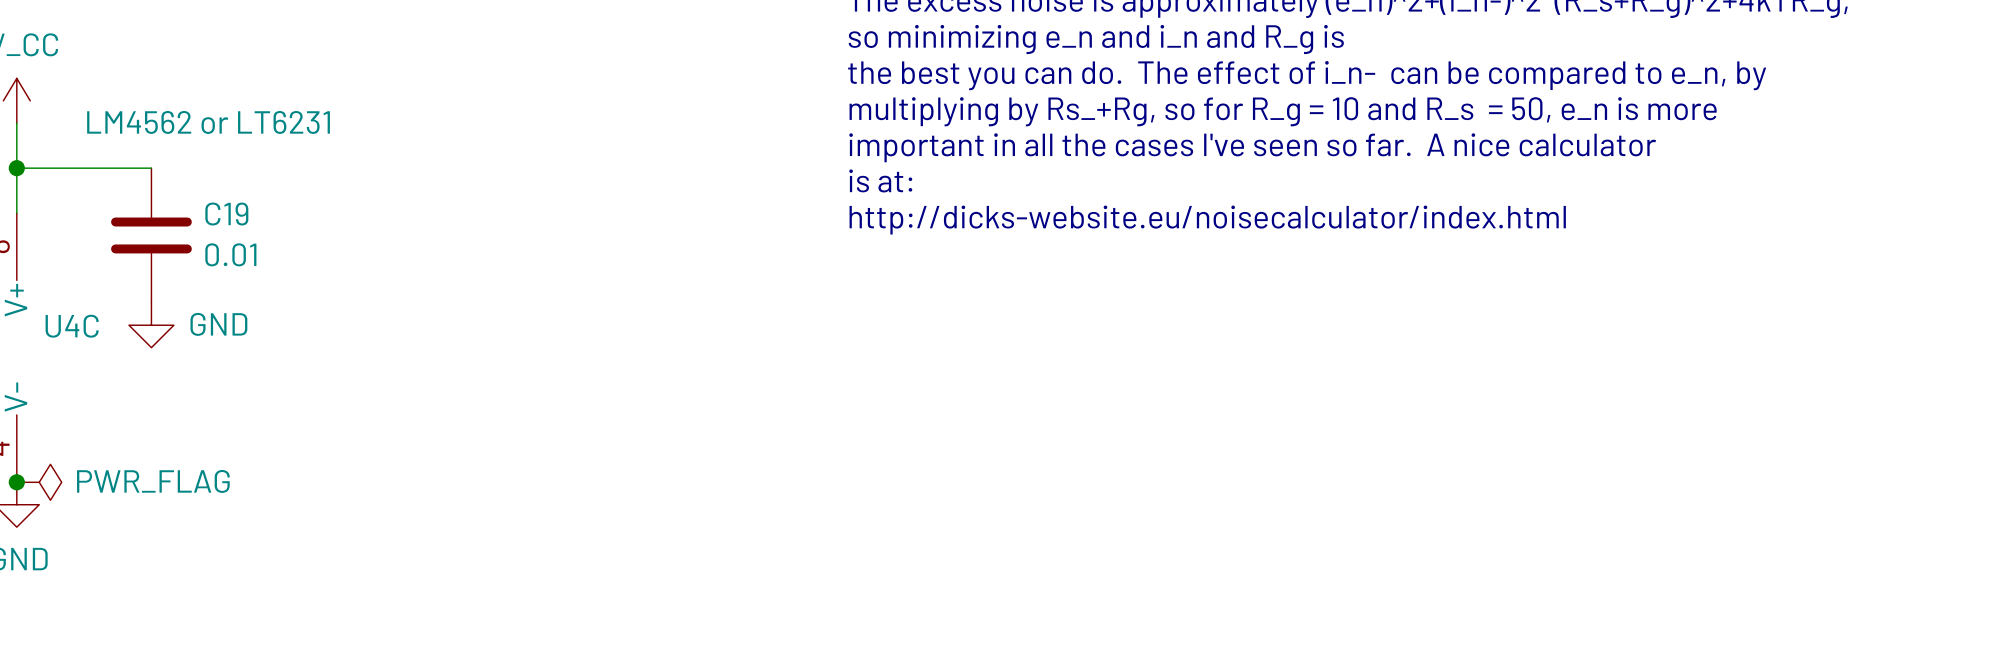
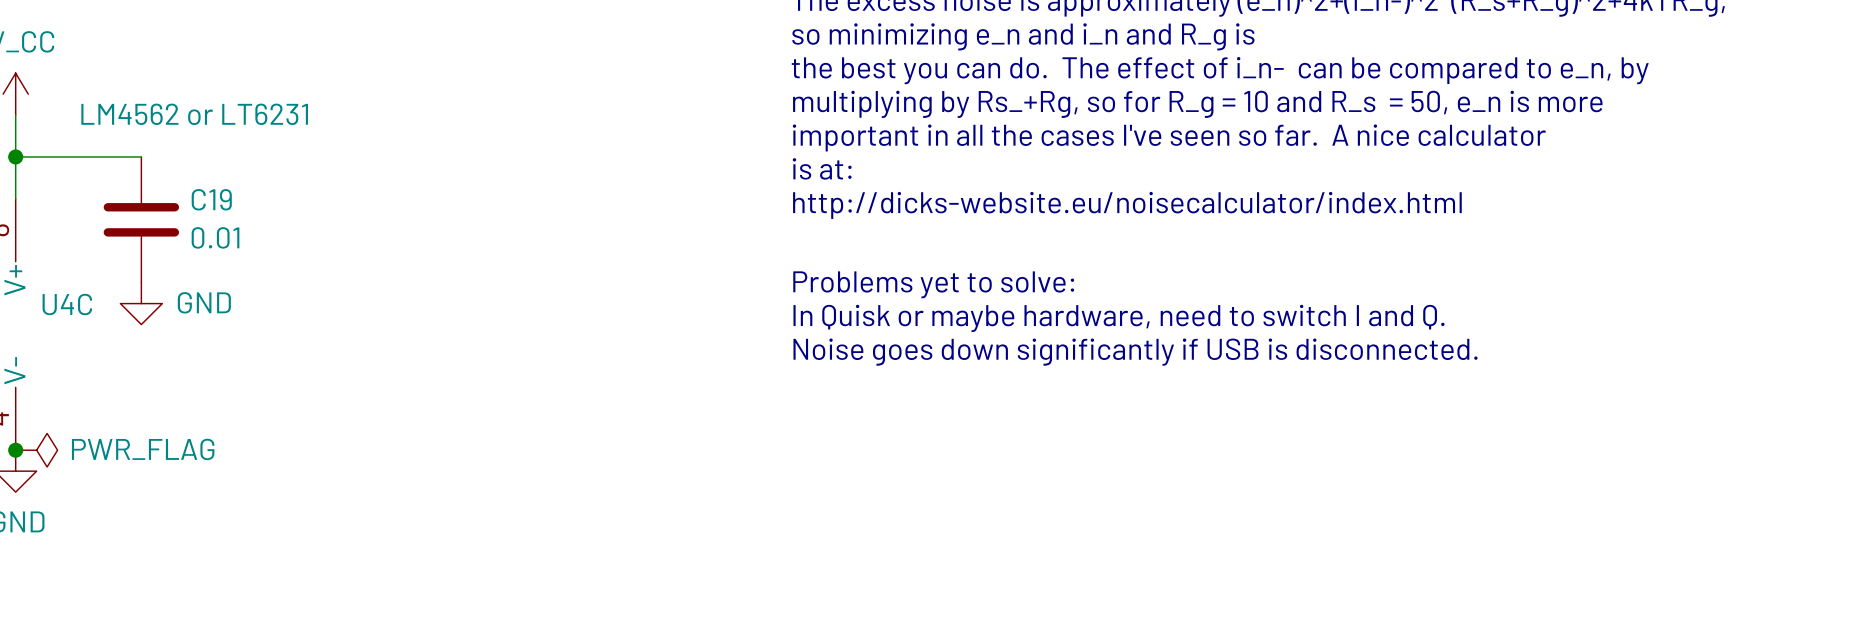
text: none -> Problems yet to solve: (933, 284)
text: none -> In Quisk or maybe hardware, need to switch I and Q. (1118, 318)
text: none -> Noise goes down significantly if USB is disconnected. (1135, 352)

